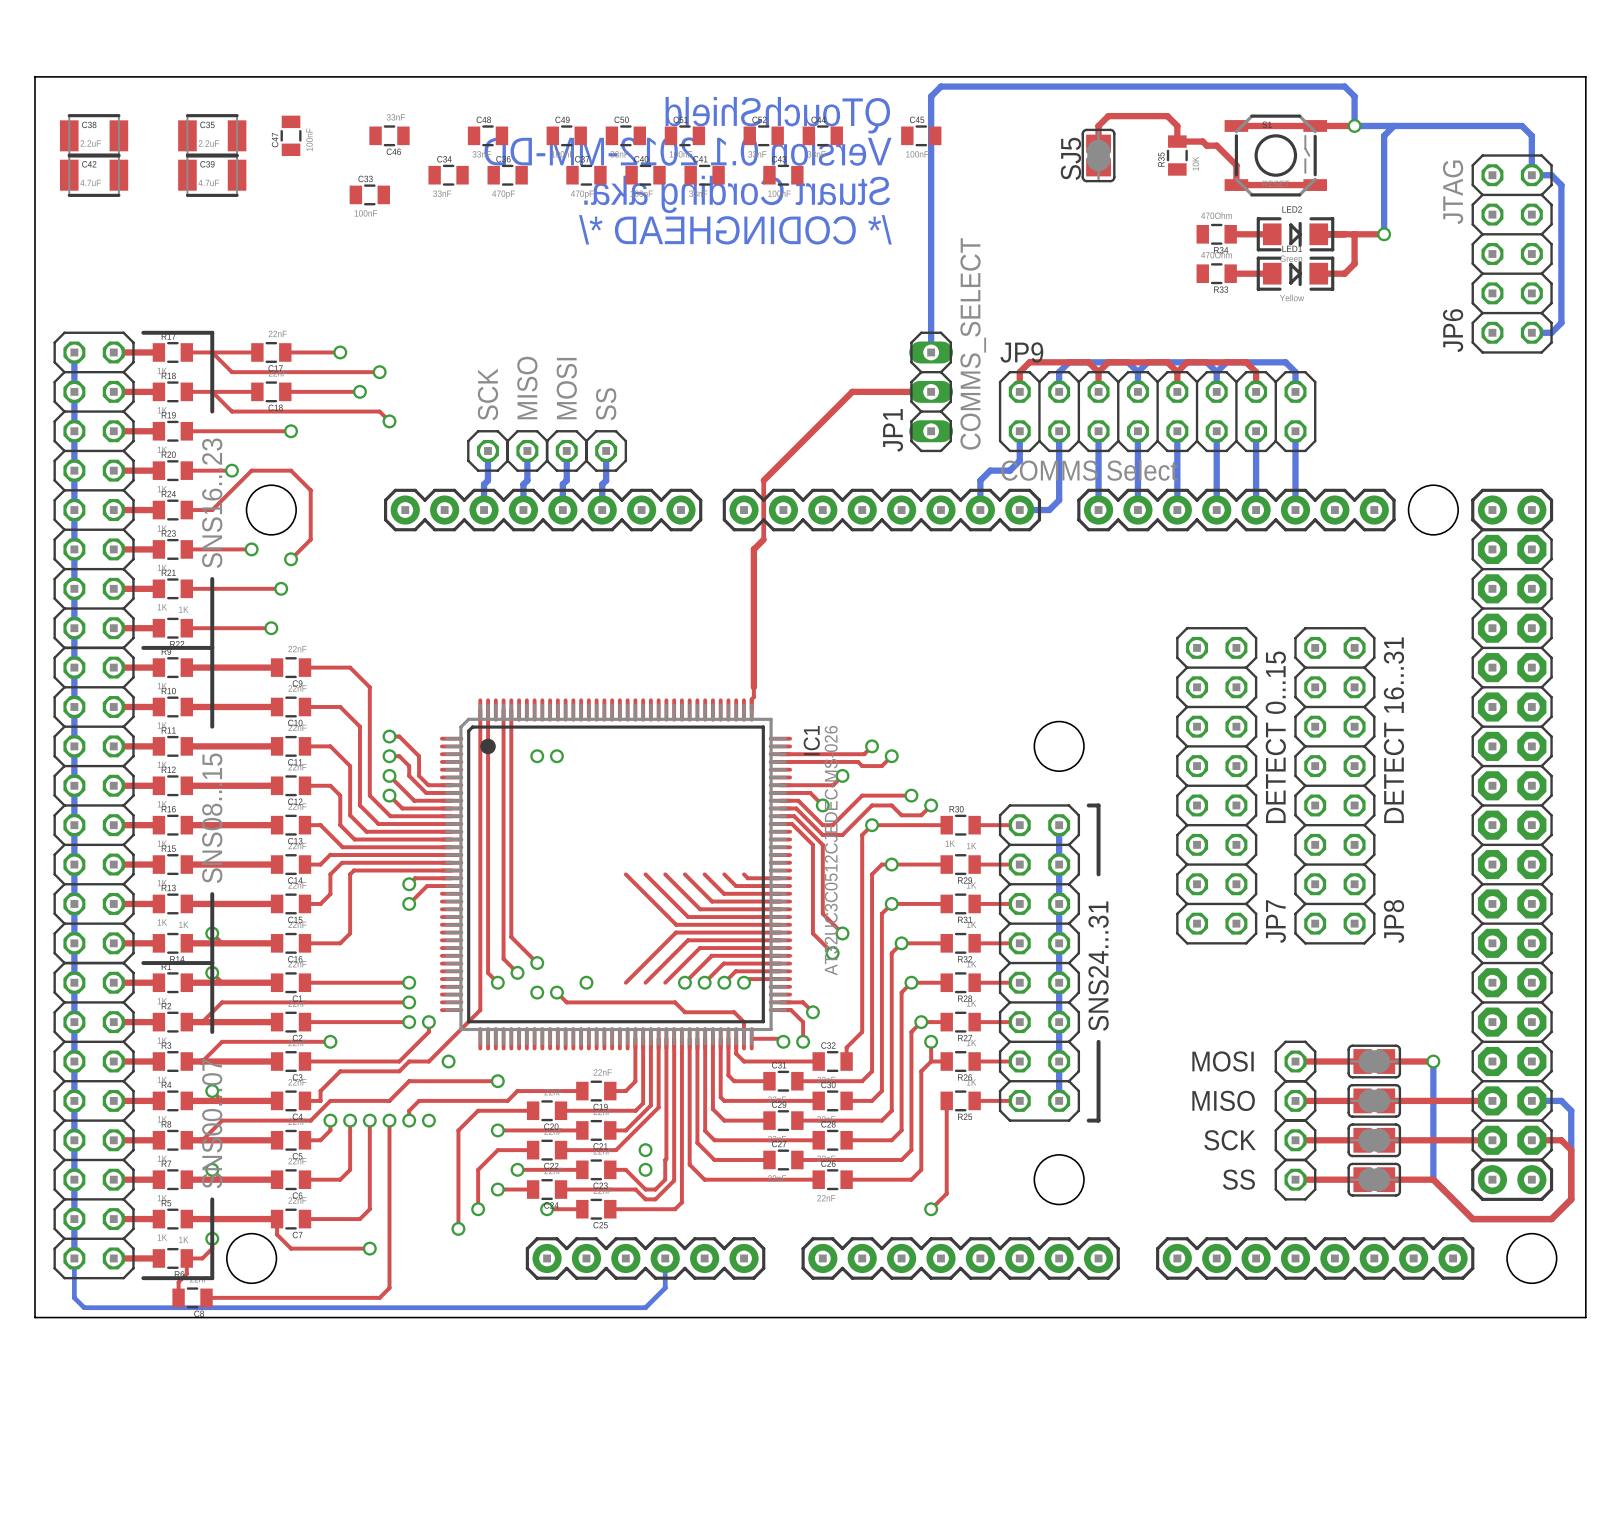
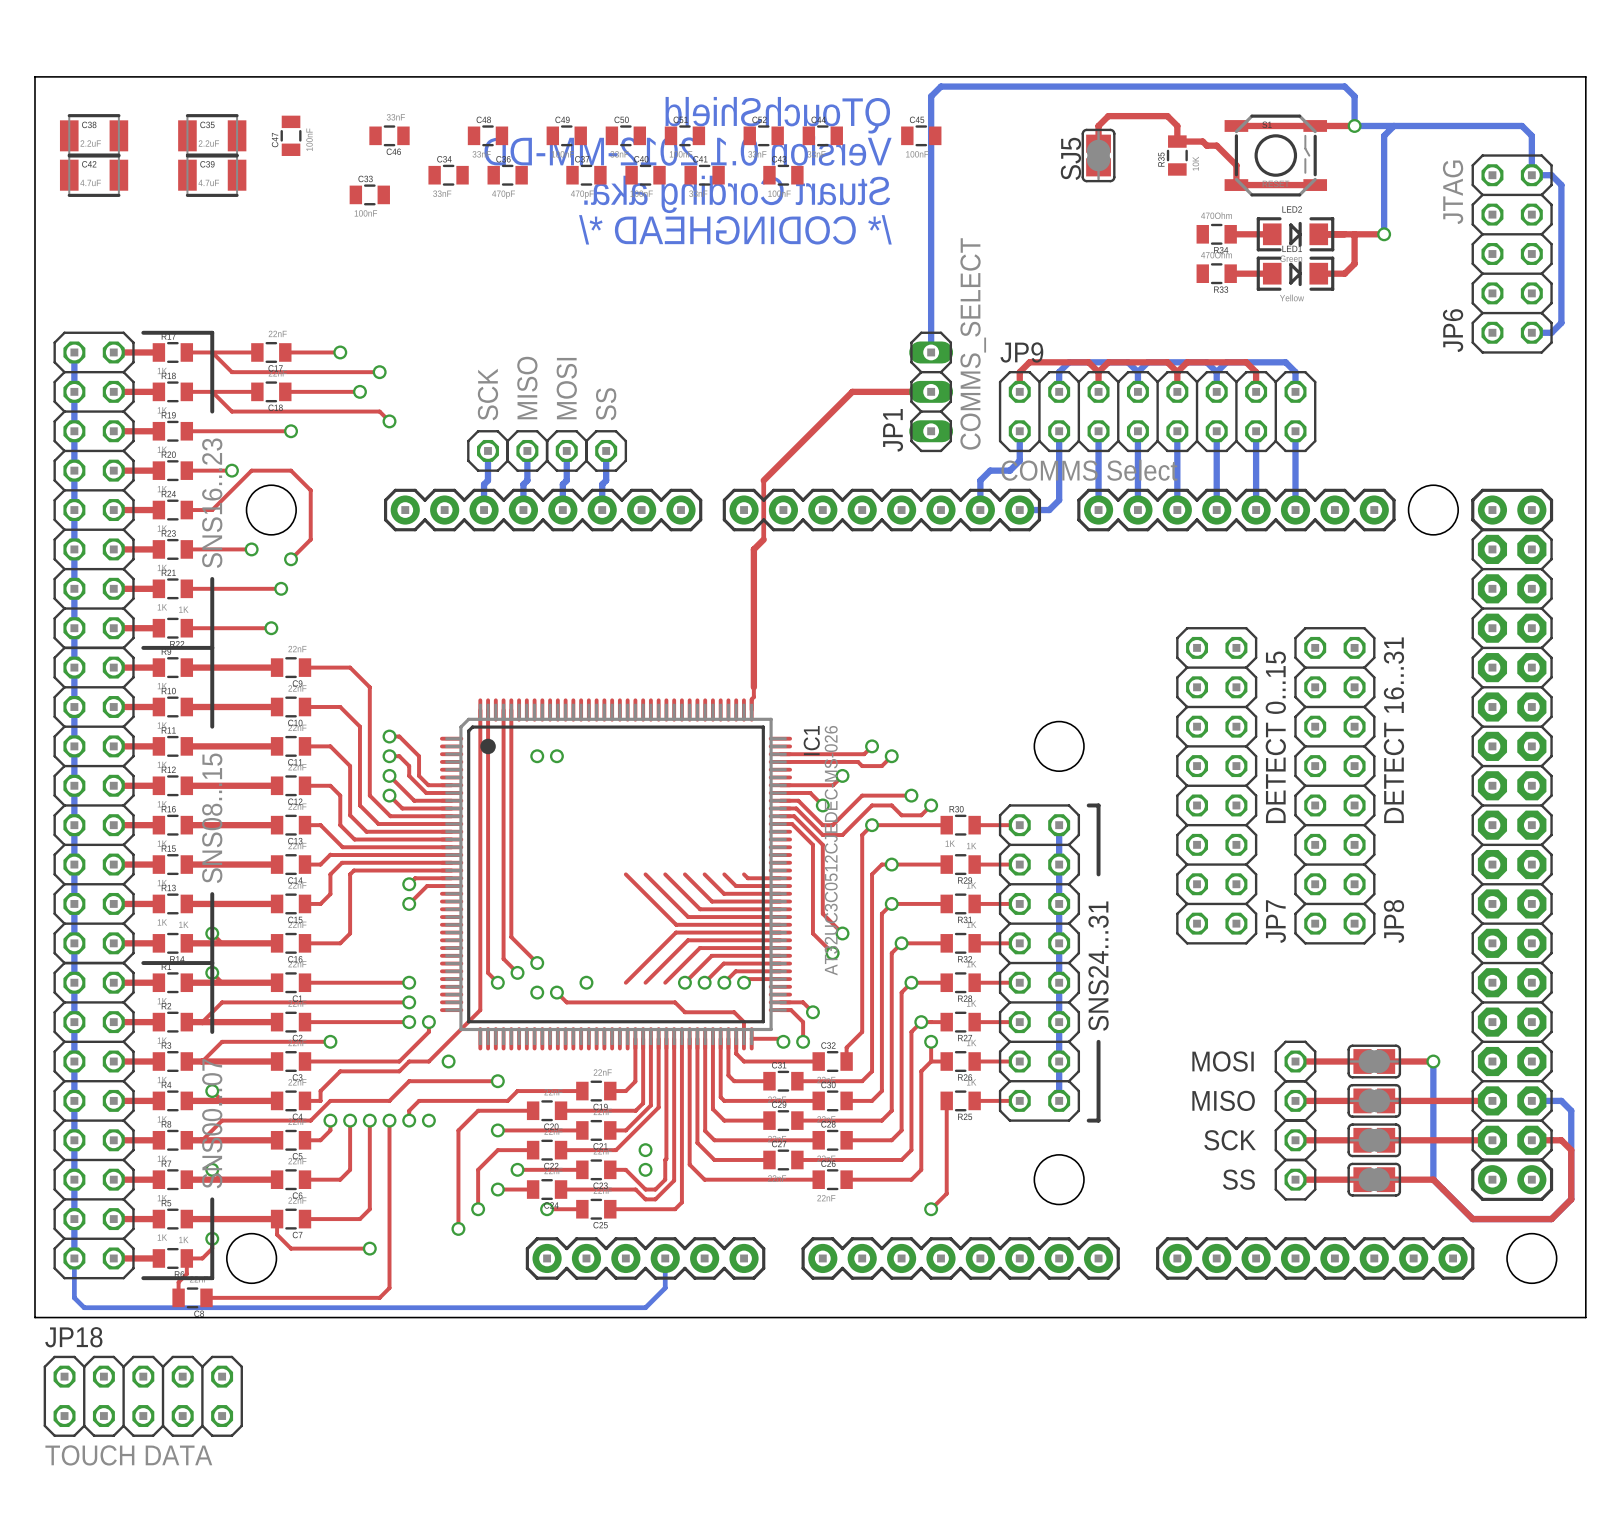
JP18: none -> TOUCH DATA (143, 1396)

